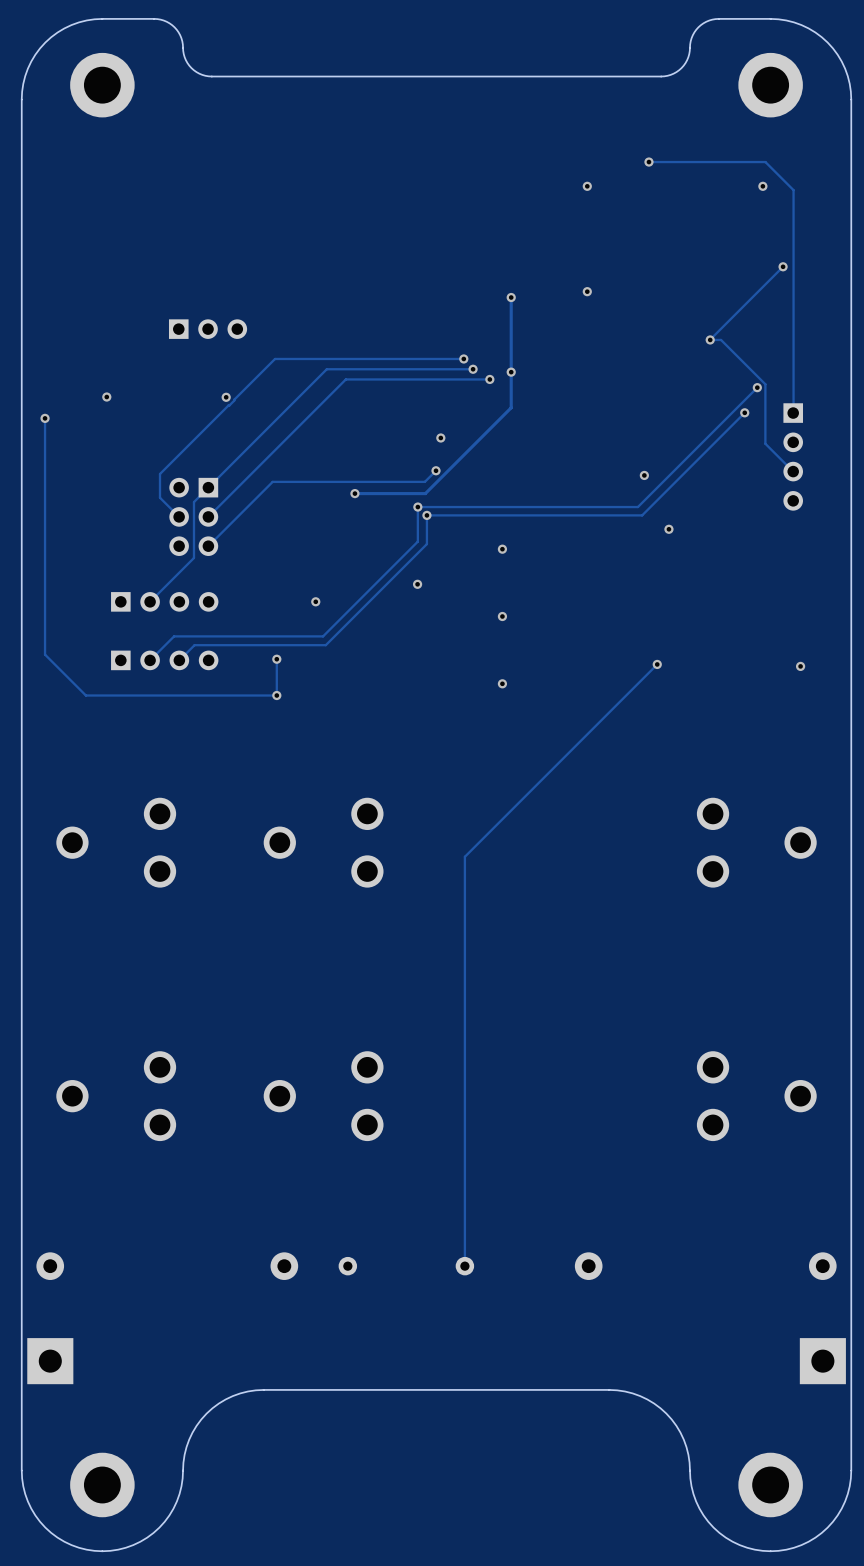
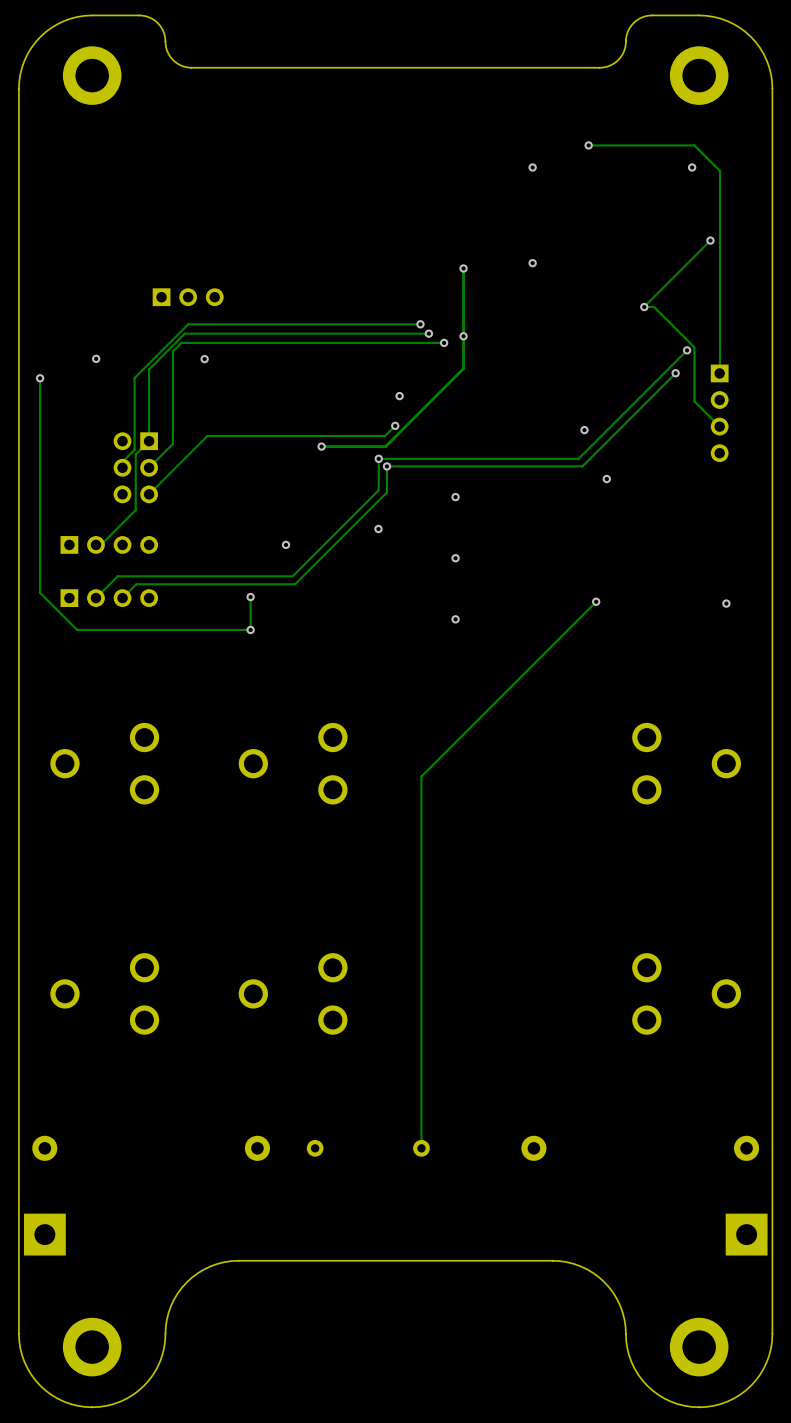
track: (275, 358) (160, 474) (160, 497) (179, 516) -> (249, 324) (188, 324) (134, 378) (134, 449) (122, 461) (122, 467)
track: (326, 369) (193, 502) (193, 557) (150, 601) -> (296, 333) (184, 333) (149, 369) (149, 441) (135, 454) (135, 510) (100, 544) (95, 544)
track: (345, 379) (208, 516) -> (313, 342) (181, 342) (172, 351) (172, 443) (149, 467)
track: (272, 481) (208, 546) -> (246, 435) (207, 435) (149, 494)
part position: (193, 516) -> (135, 467)
part: none -> (109, 544)
part: (164, 601) -> none
track: (174, 636) (150, 660) -> (157, 576) (117, 576) (95, 598)
track: (194, 645) (179, 660) -> (175, 584) (136, 584) (122, 598)
part: none -> (109, 598)
part: (164, 660) -> none

